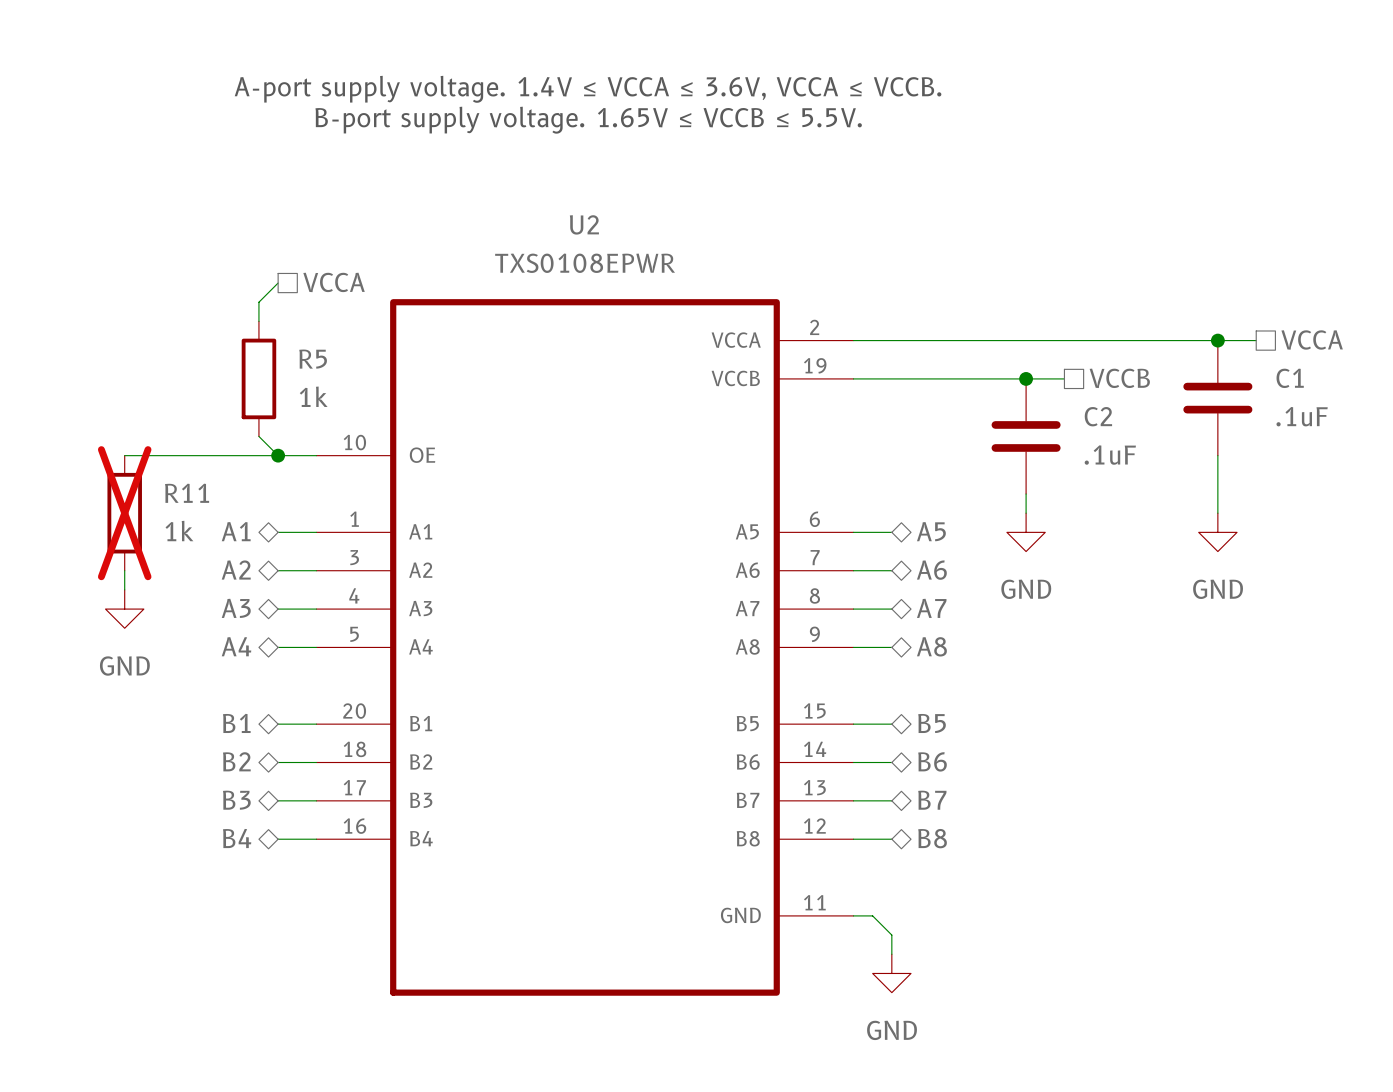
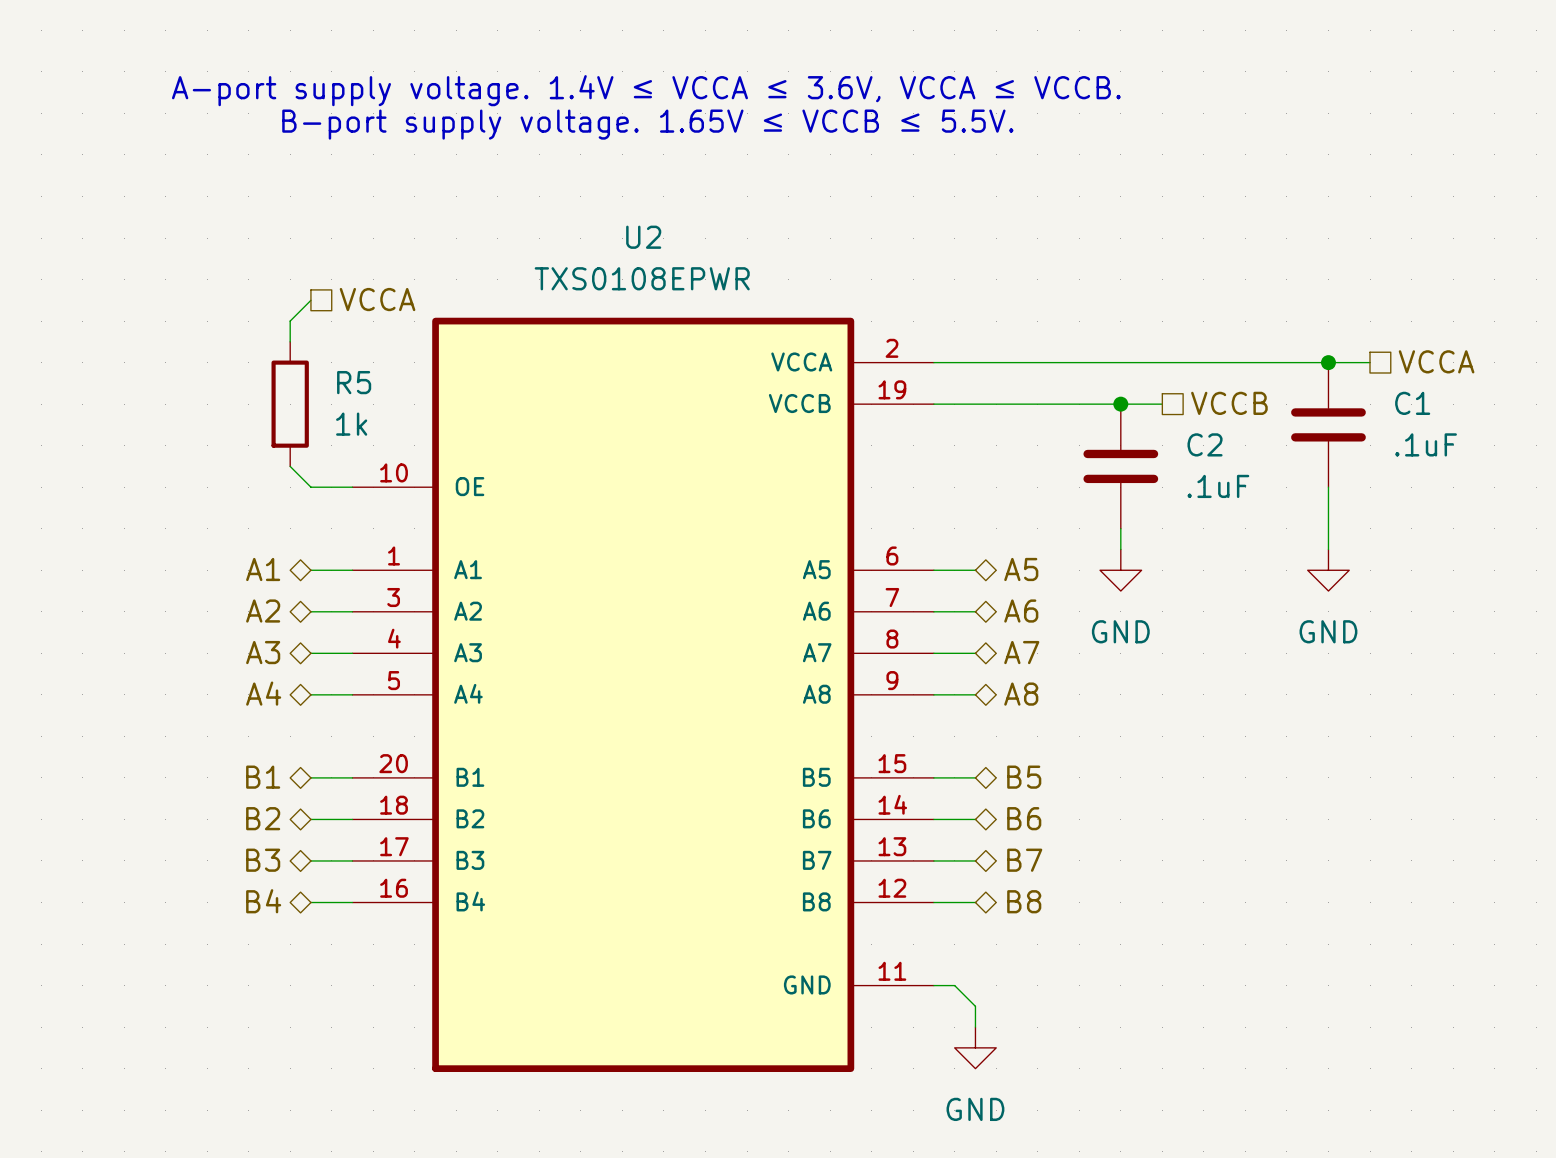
wire: (124, 455) (278, 455) -> none
junction: (278, 455) -> none
R11: 1k (124, 513) -> none
wire: (124, 570) (124, 589) -> none
power symbol: GND (124, 609) -> none

